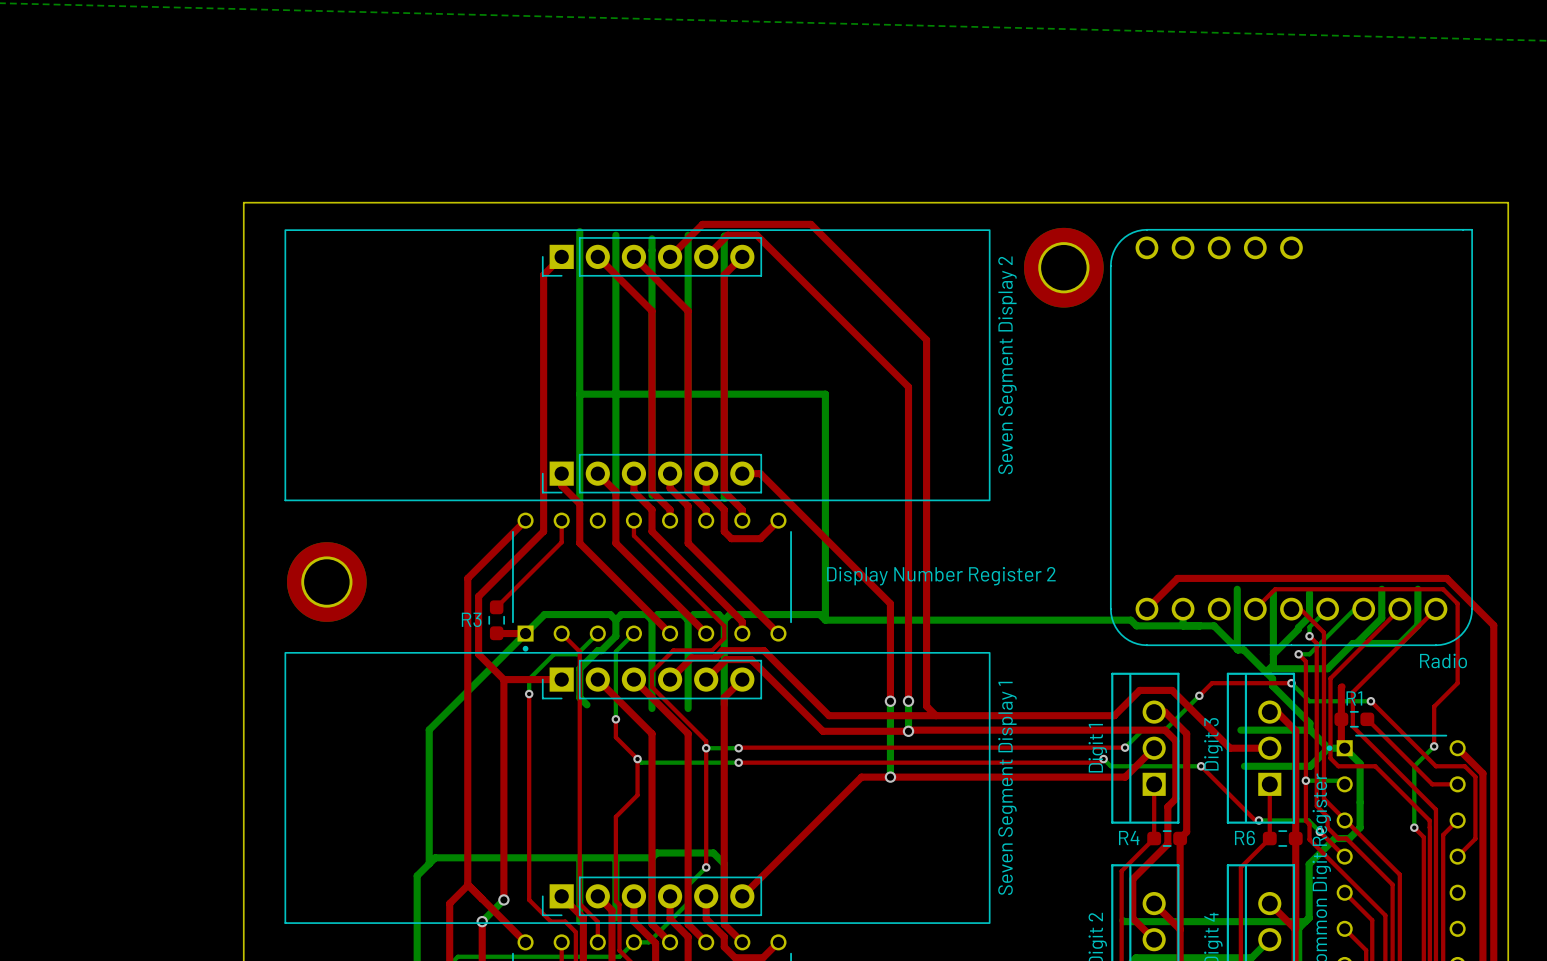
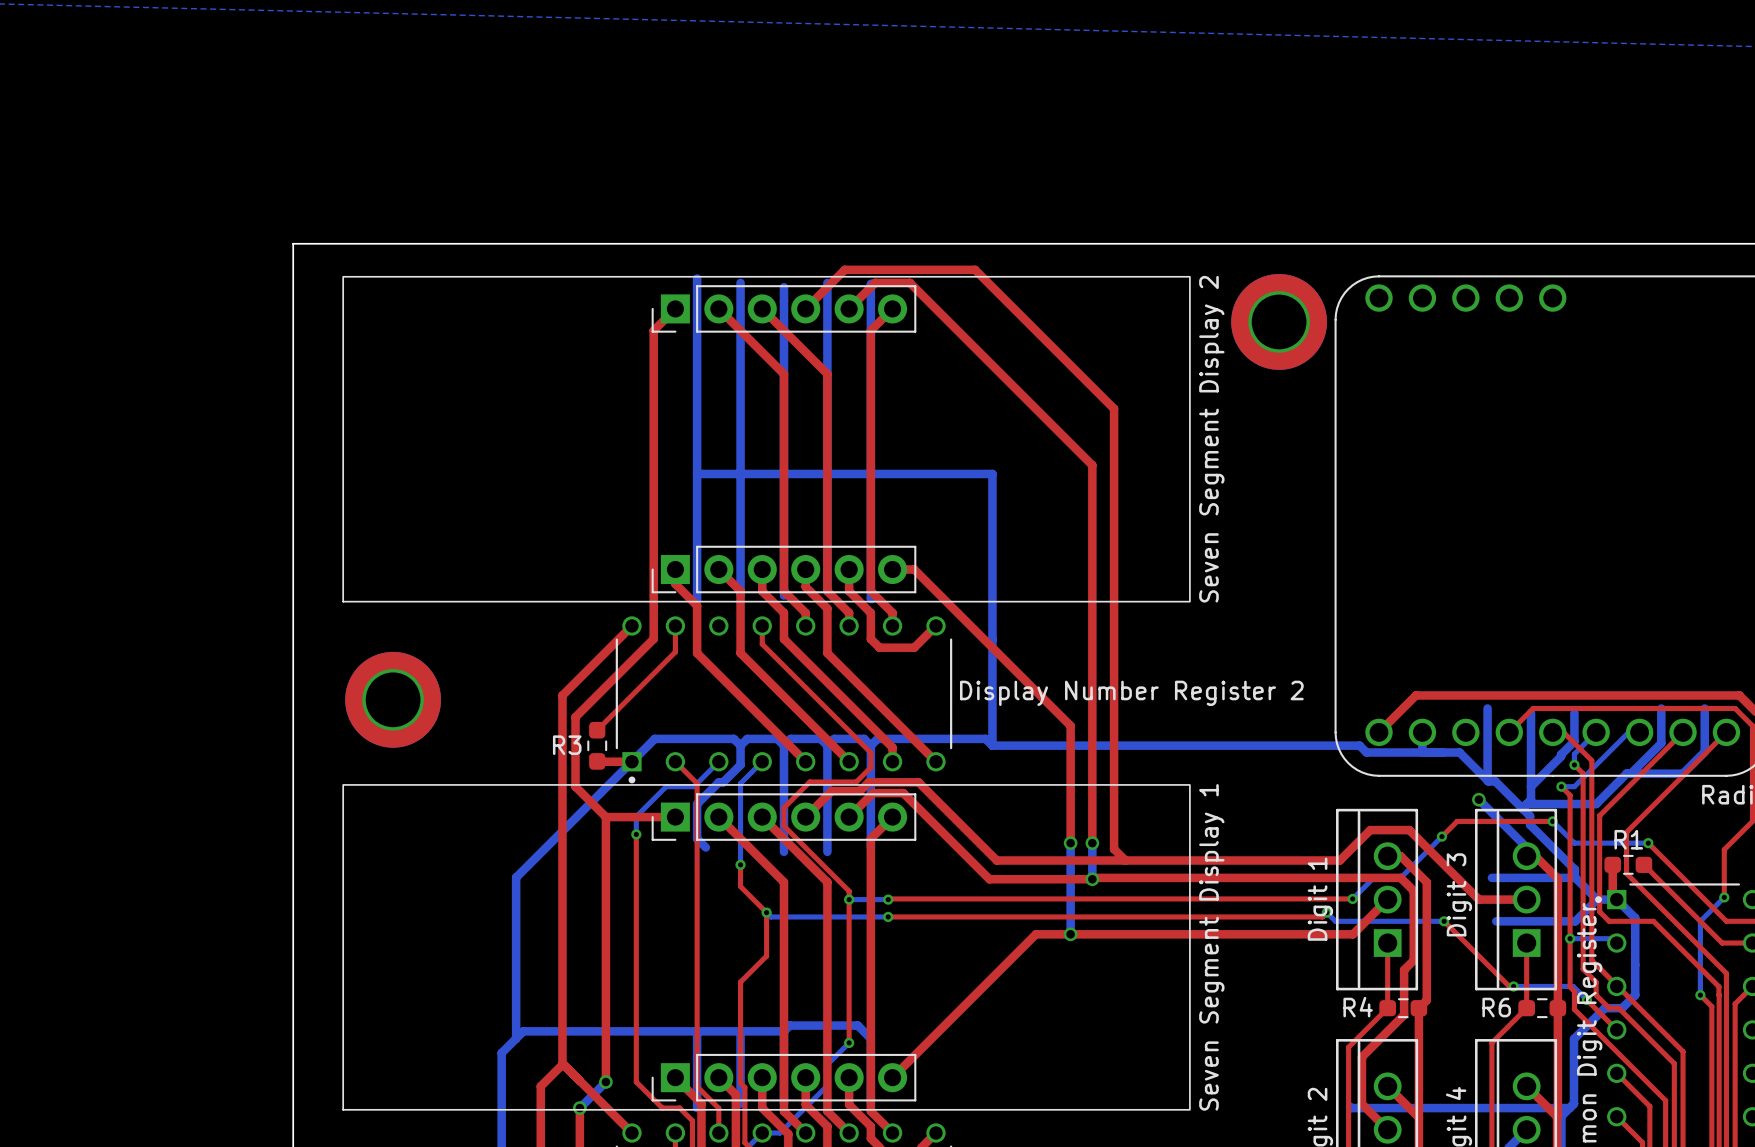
bottom track: none -> (1478, 799) (1526, 847)
via: none -> (1478, 799)
top track: (1342, 686) (1341, 719) -> none

